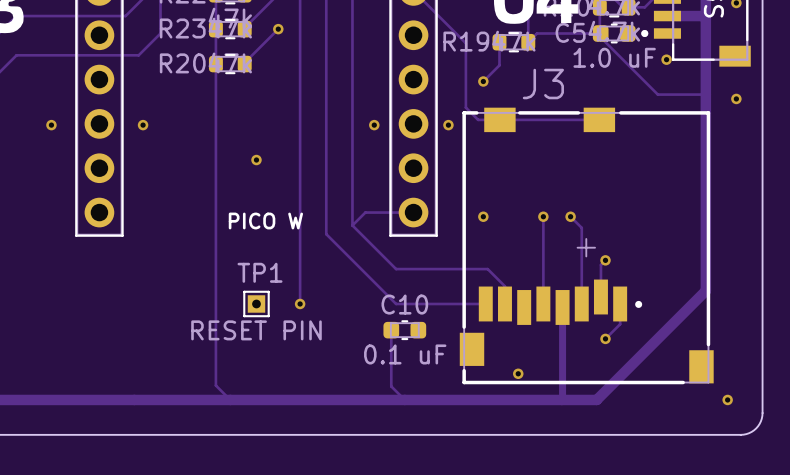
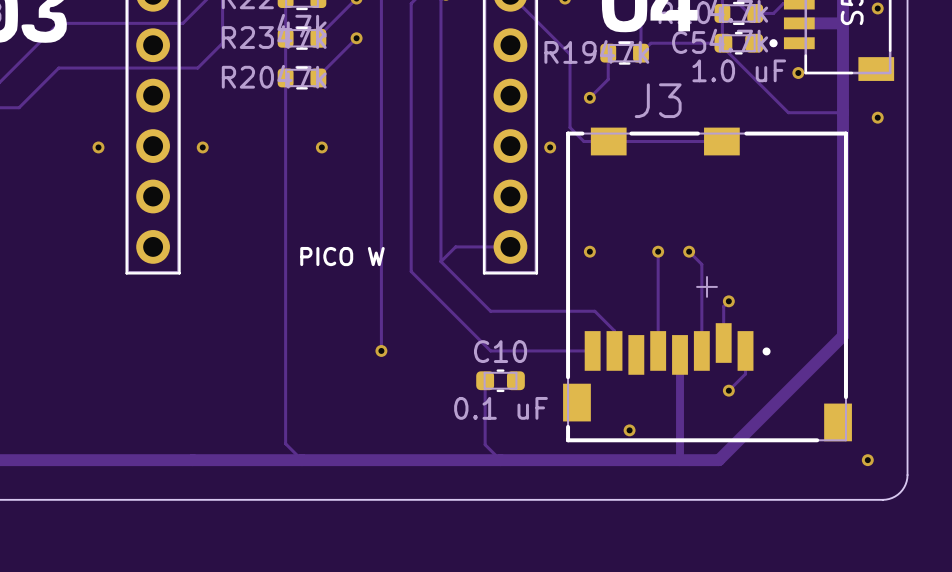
via: (374, 125) -> none
via position: (256, 160) -> (321, 147)
TP1: RESET PIN (256, 303) -> none

